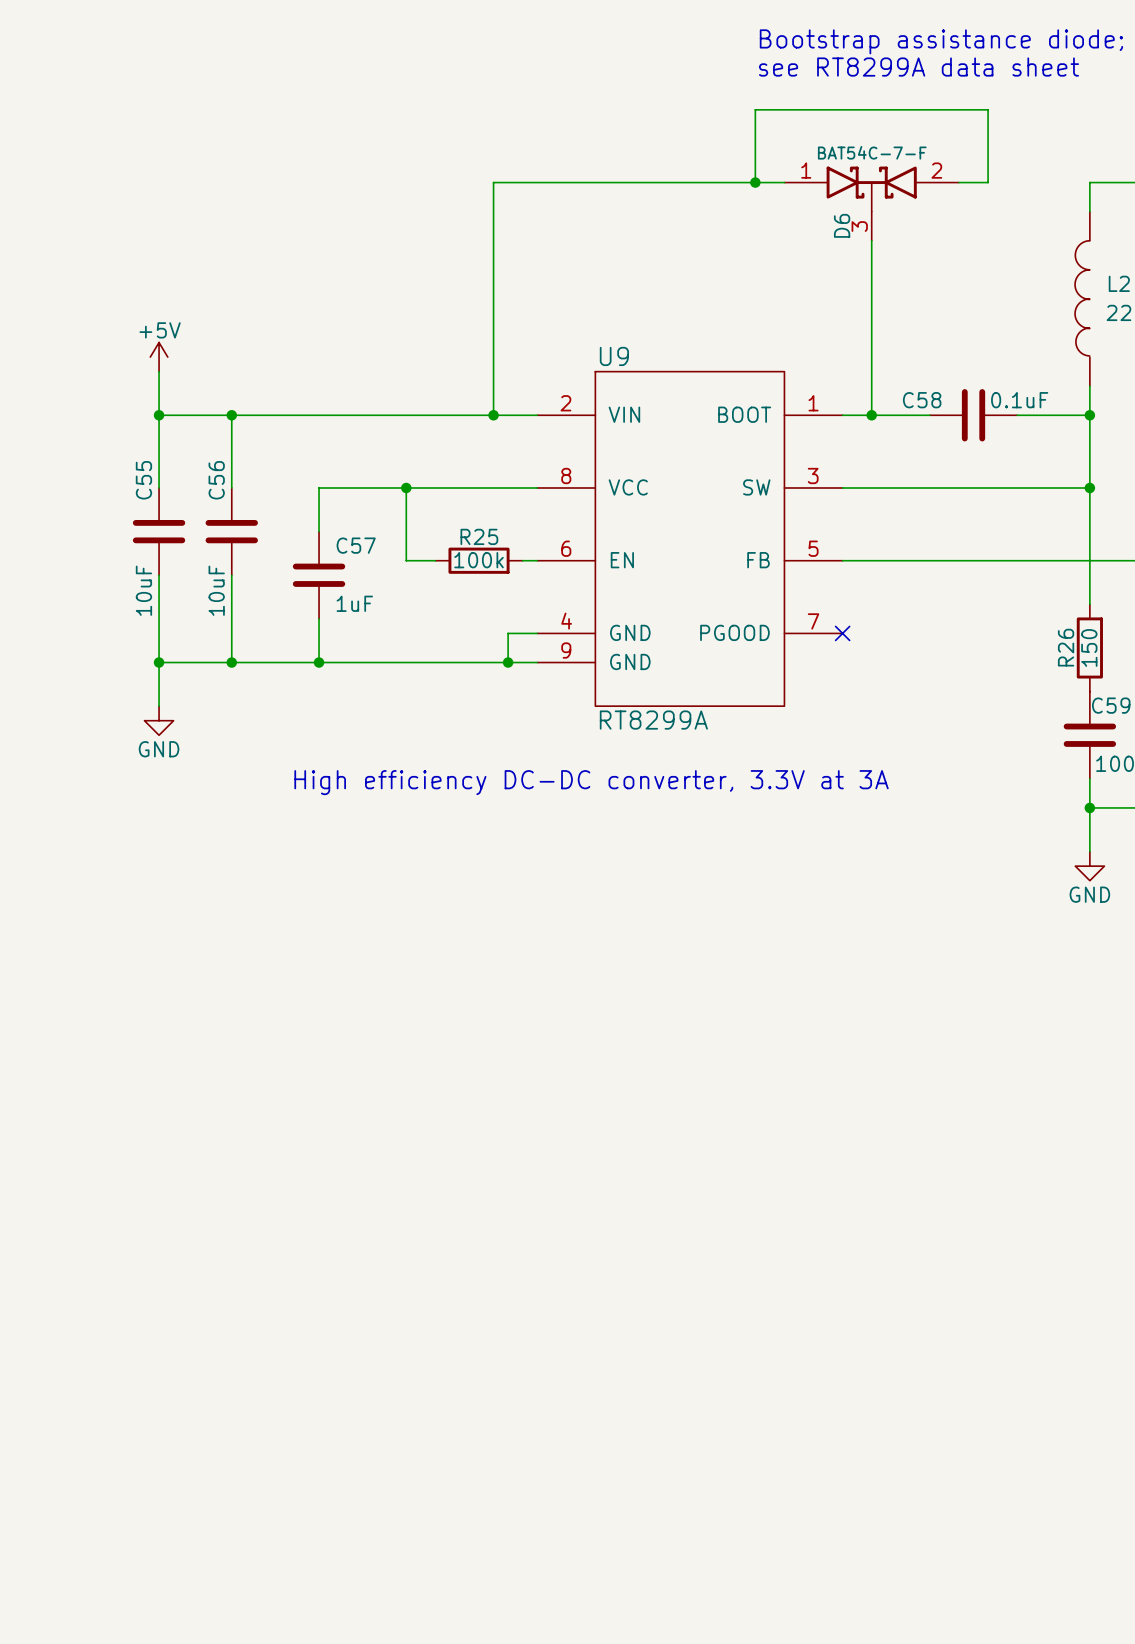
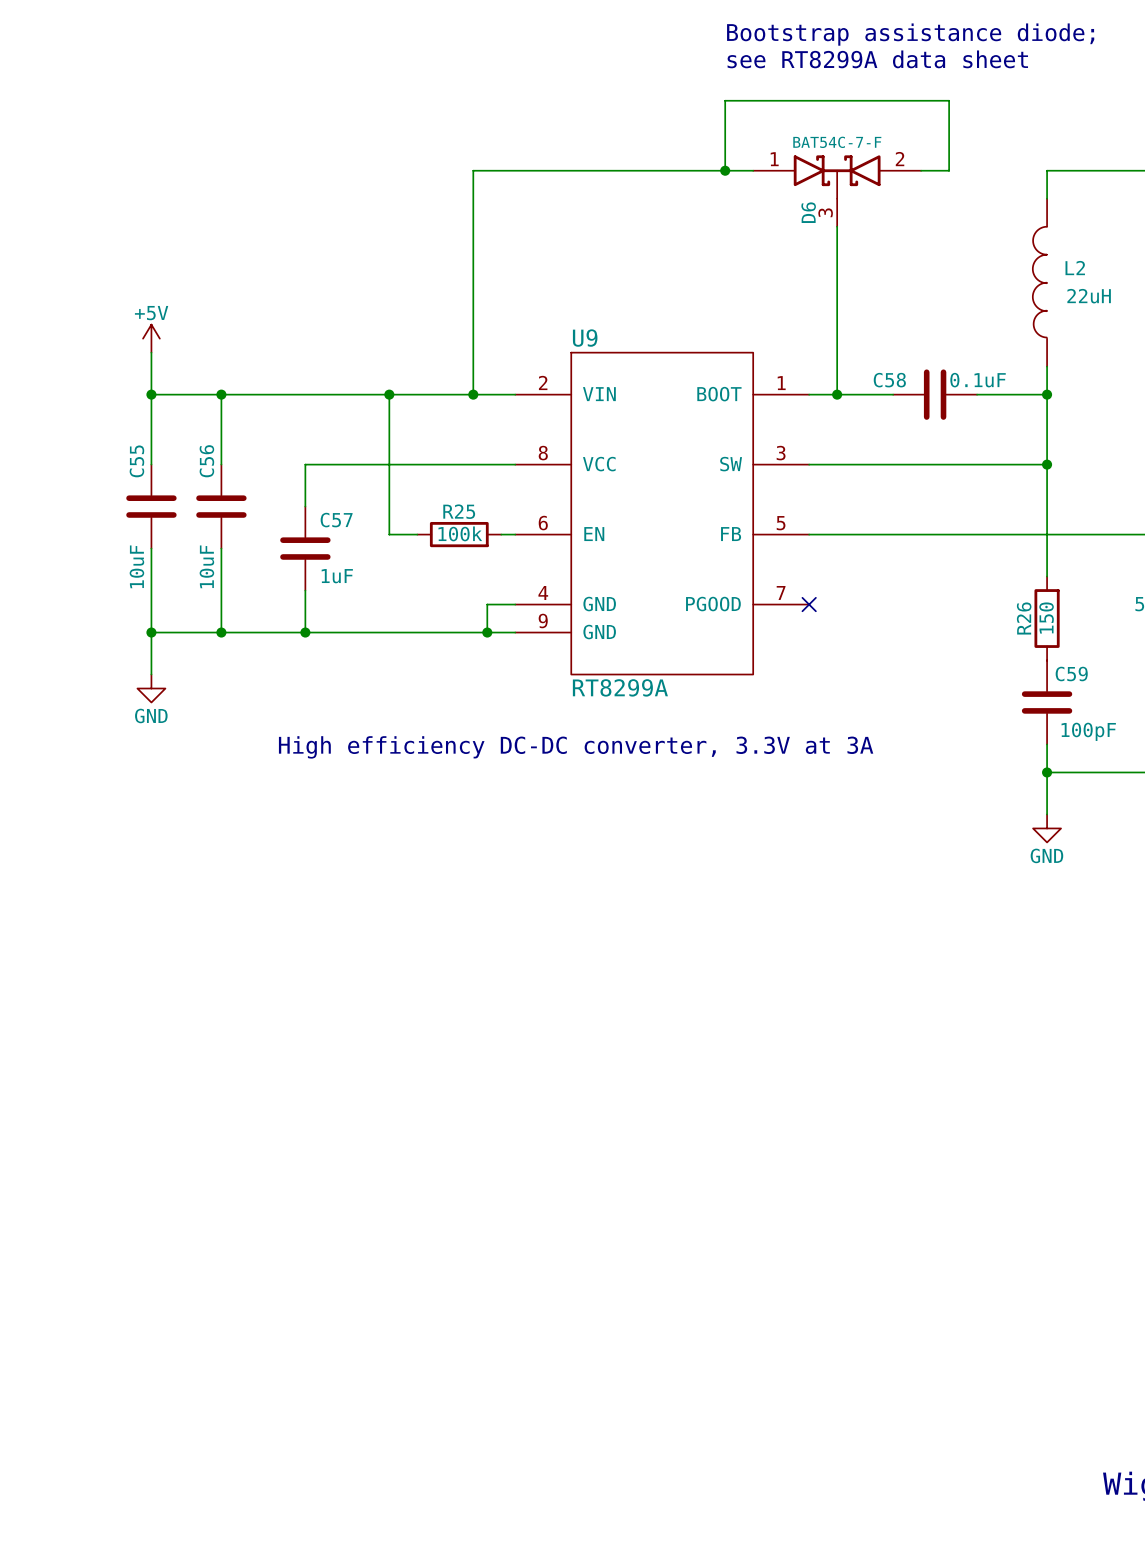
wire: none -> (389, 394) (389, 464)
junction: none -> (389, 394)
junction: (406, 487) -> none

